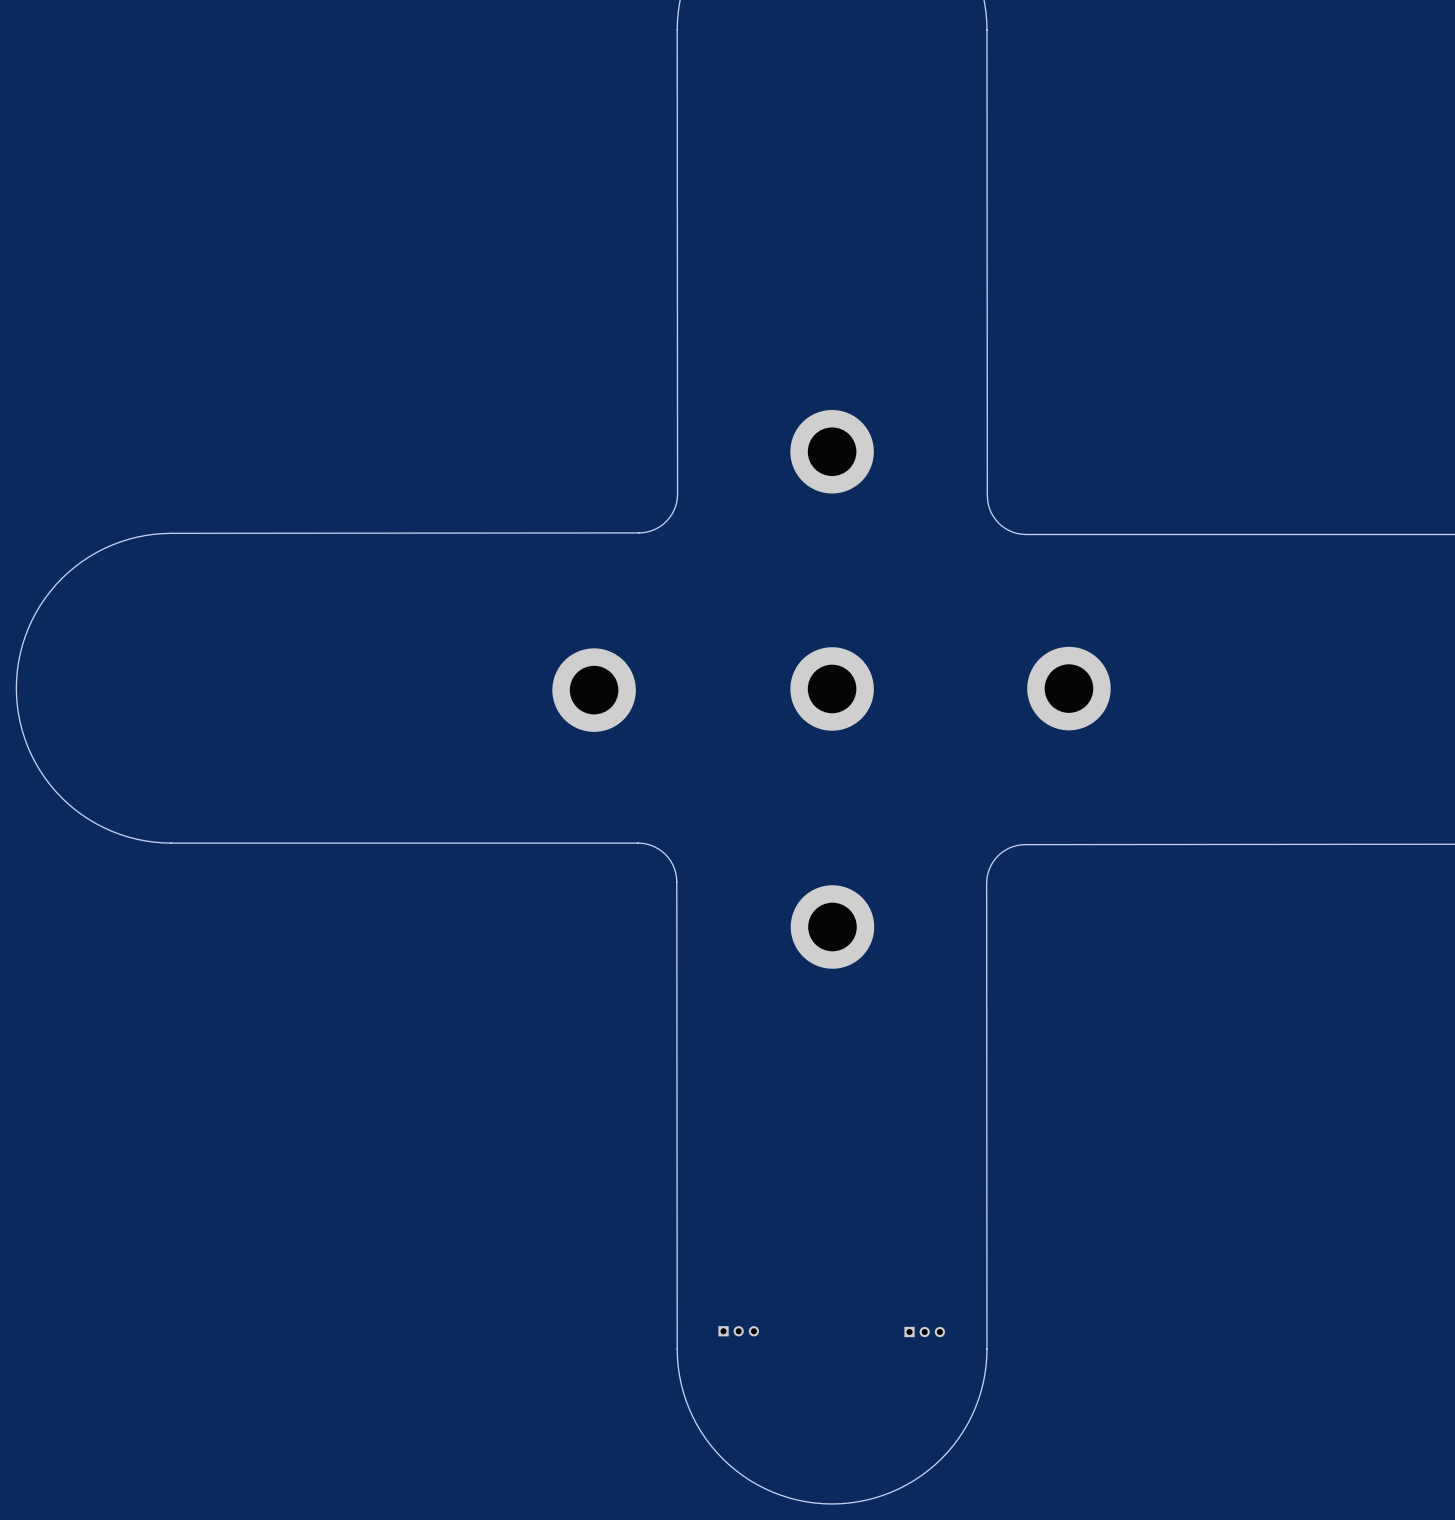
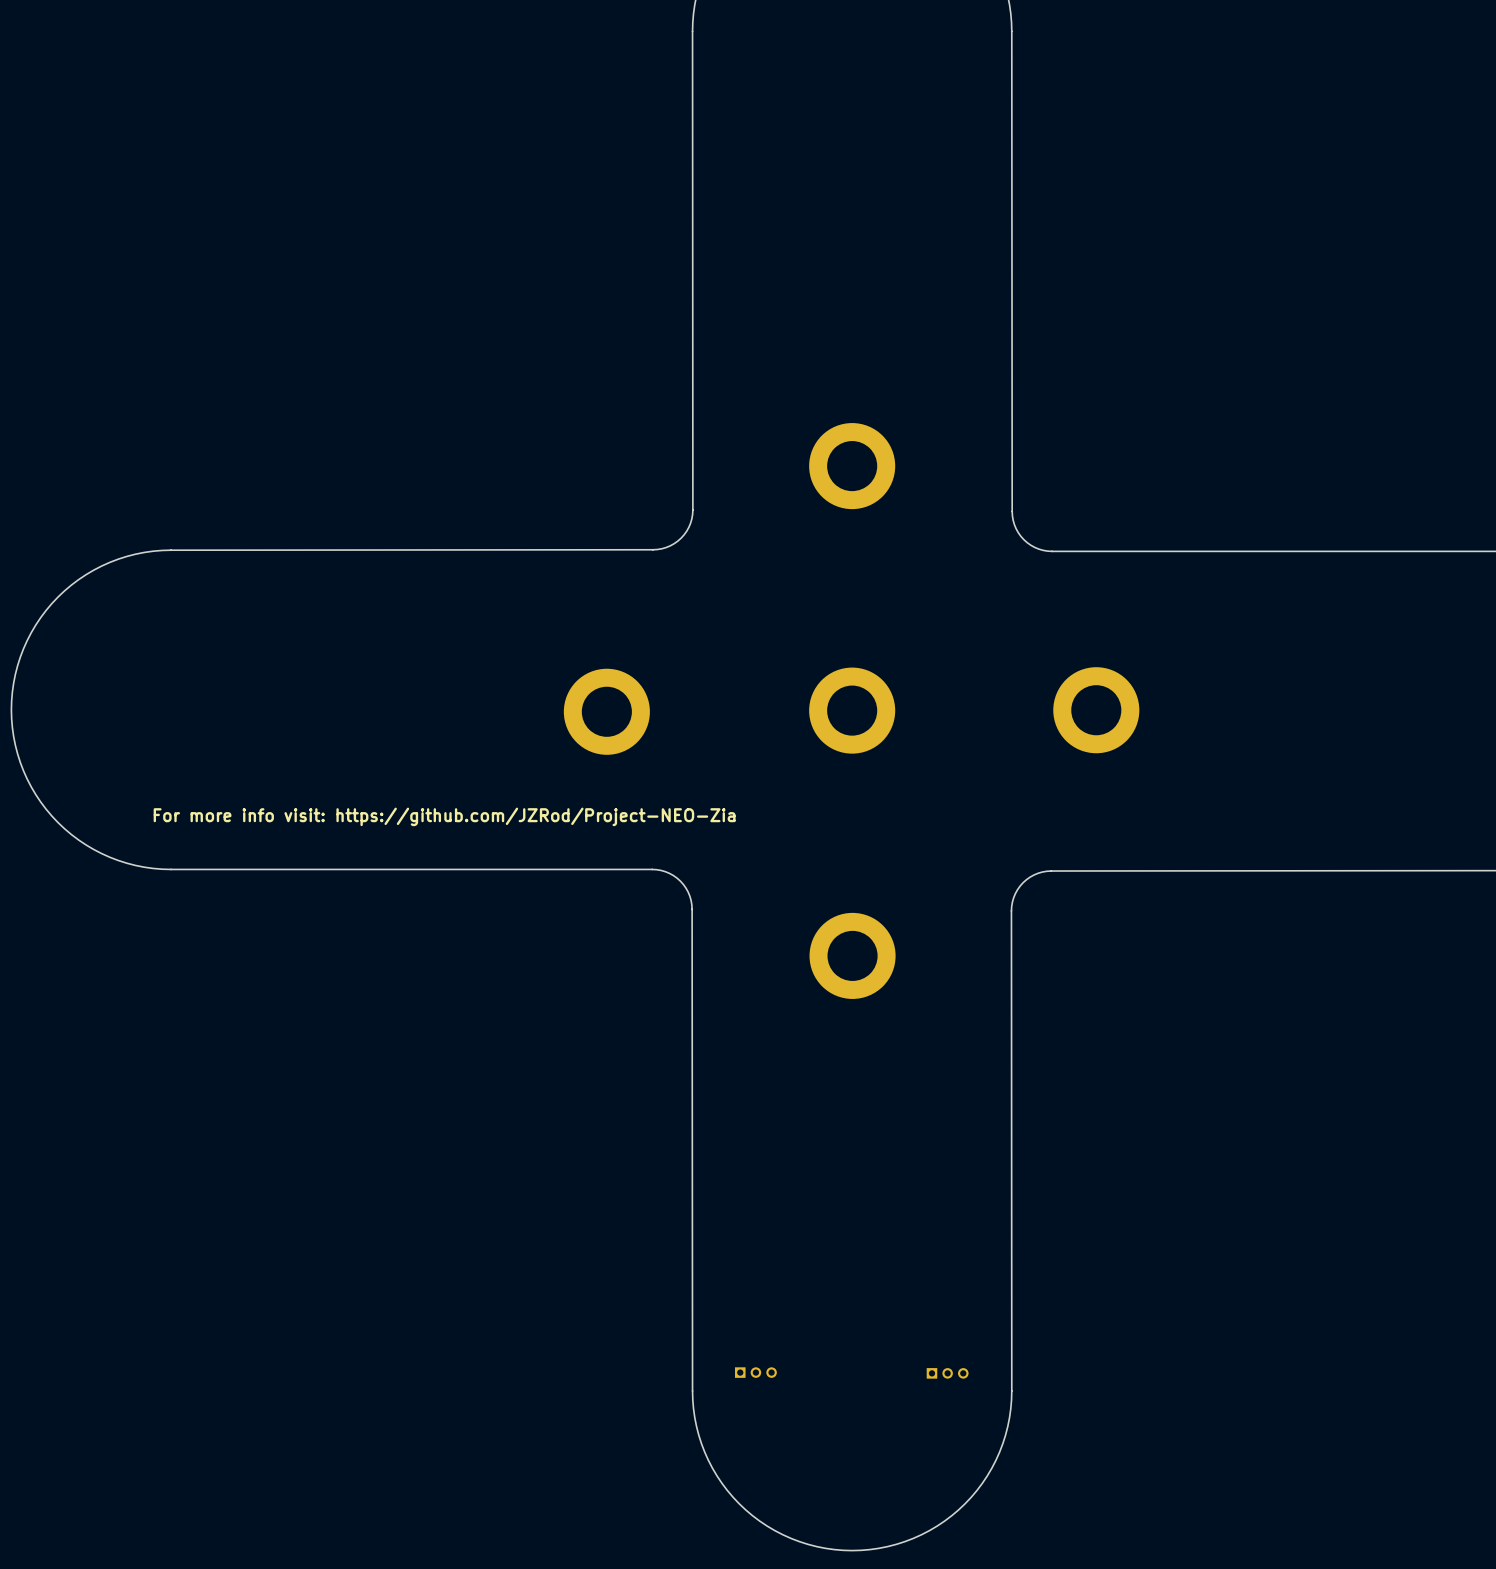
text: none -> For more info visit: https://github.com/JZRod/Project-NEO-Zia (444, 816)

